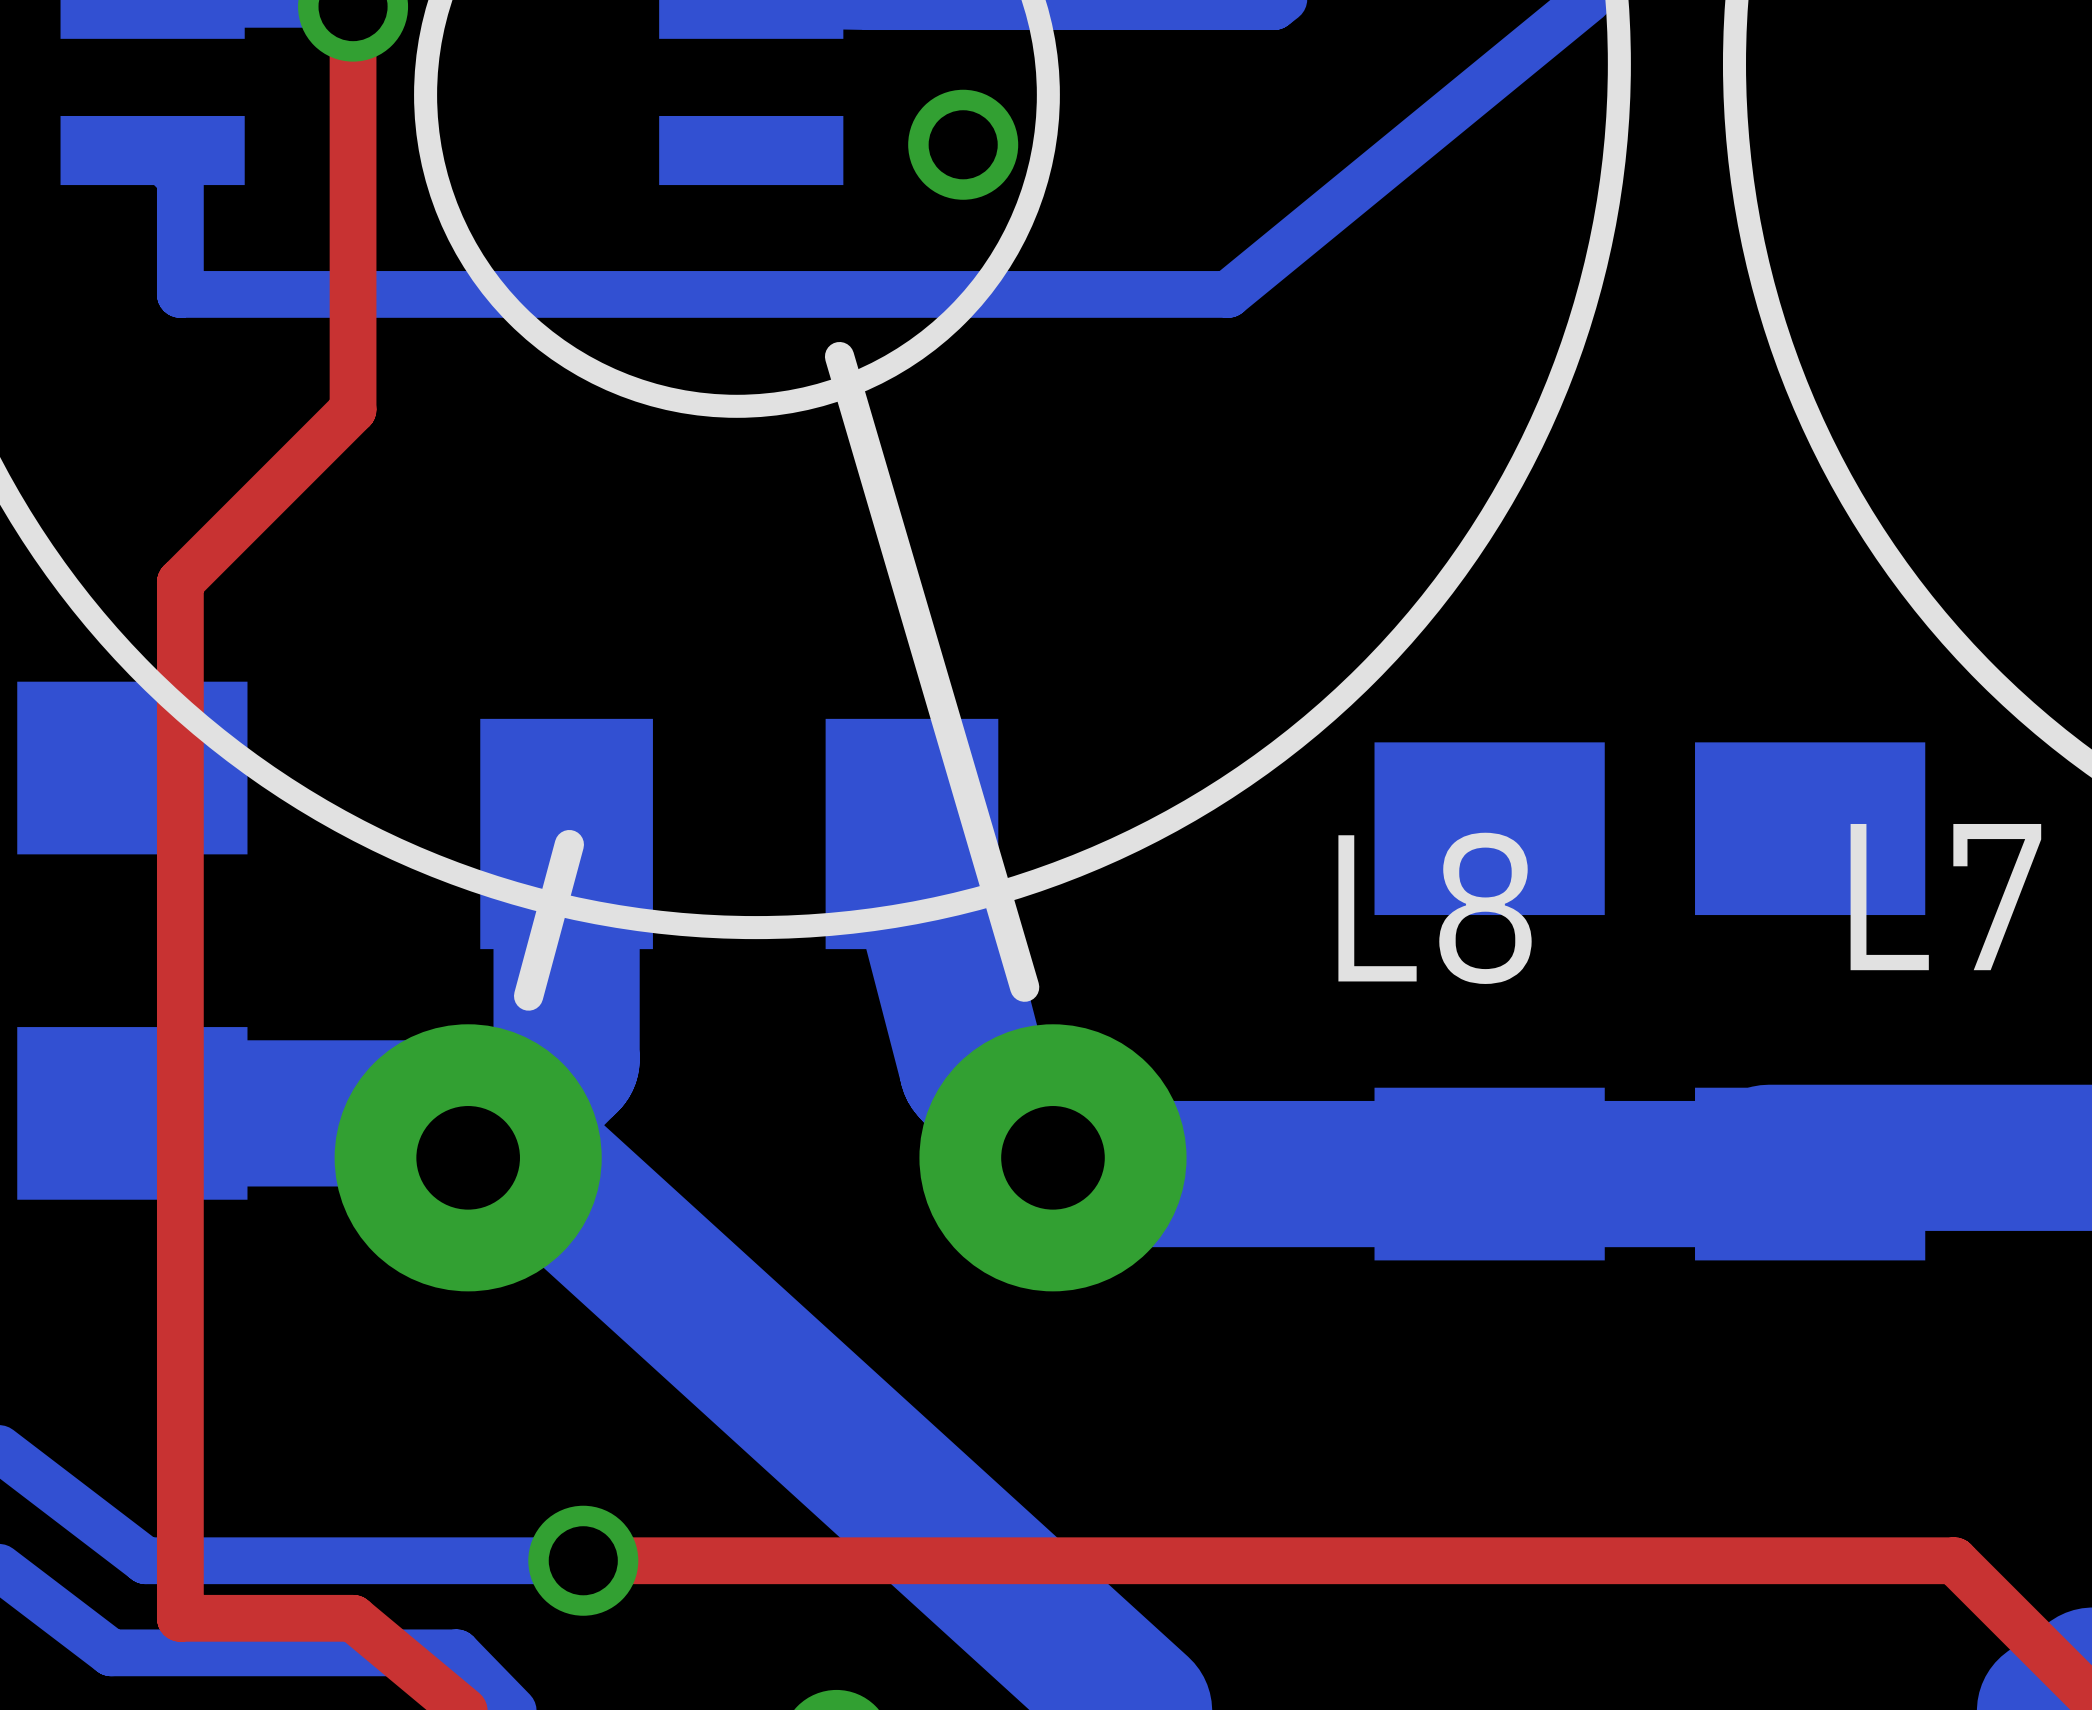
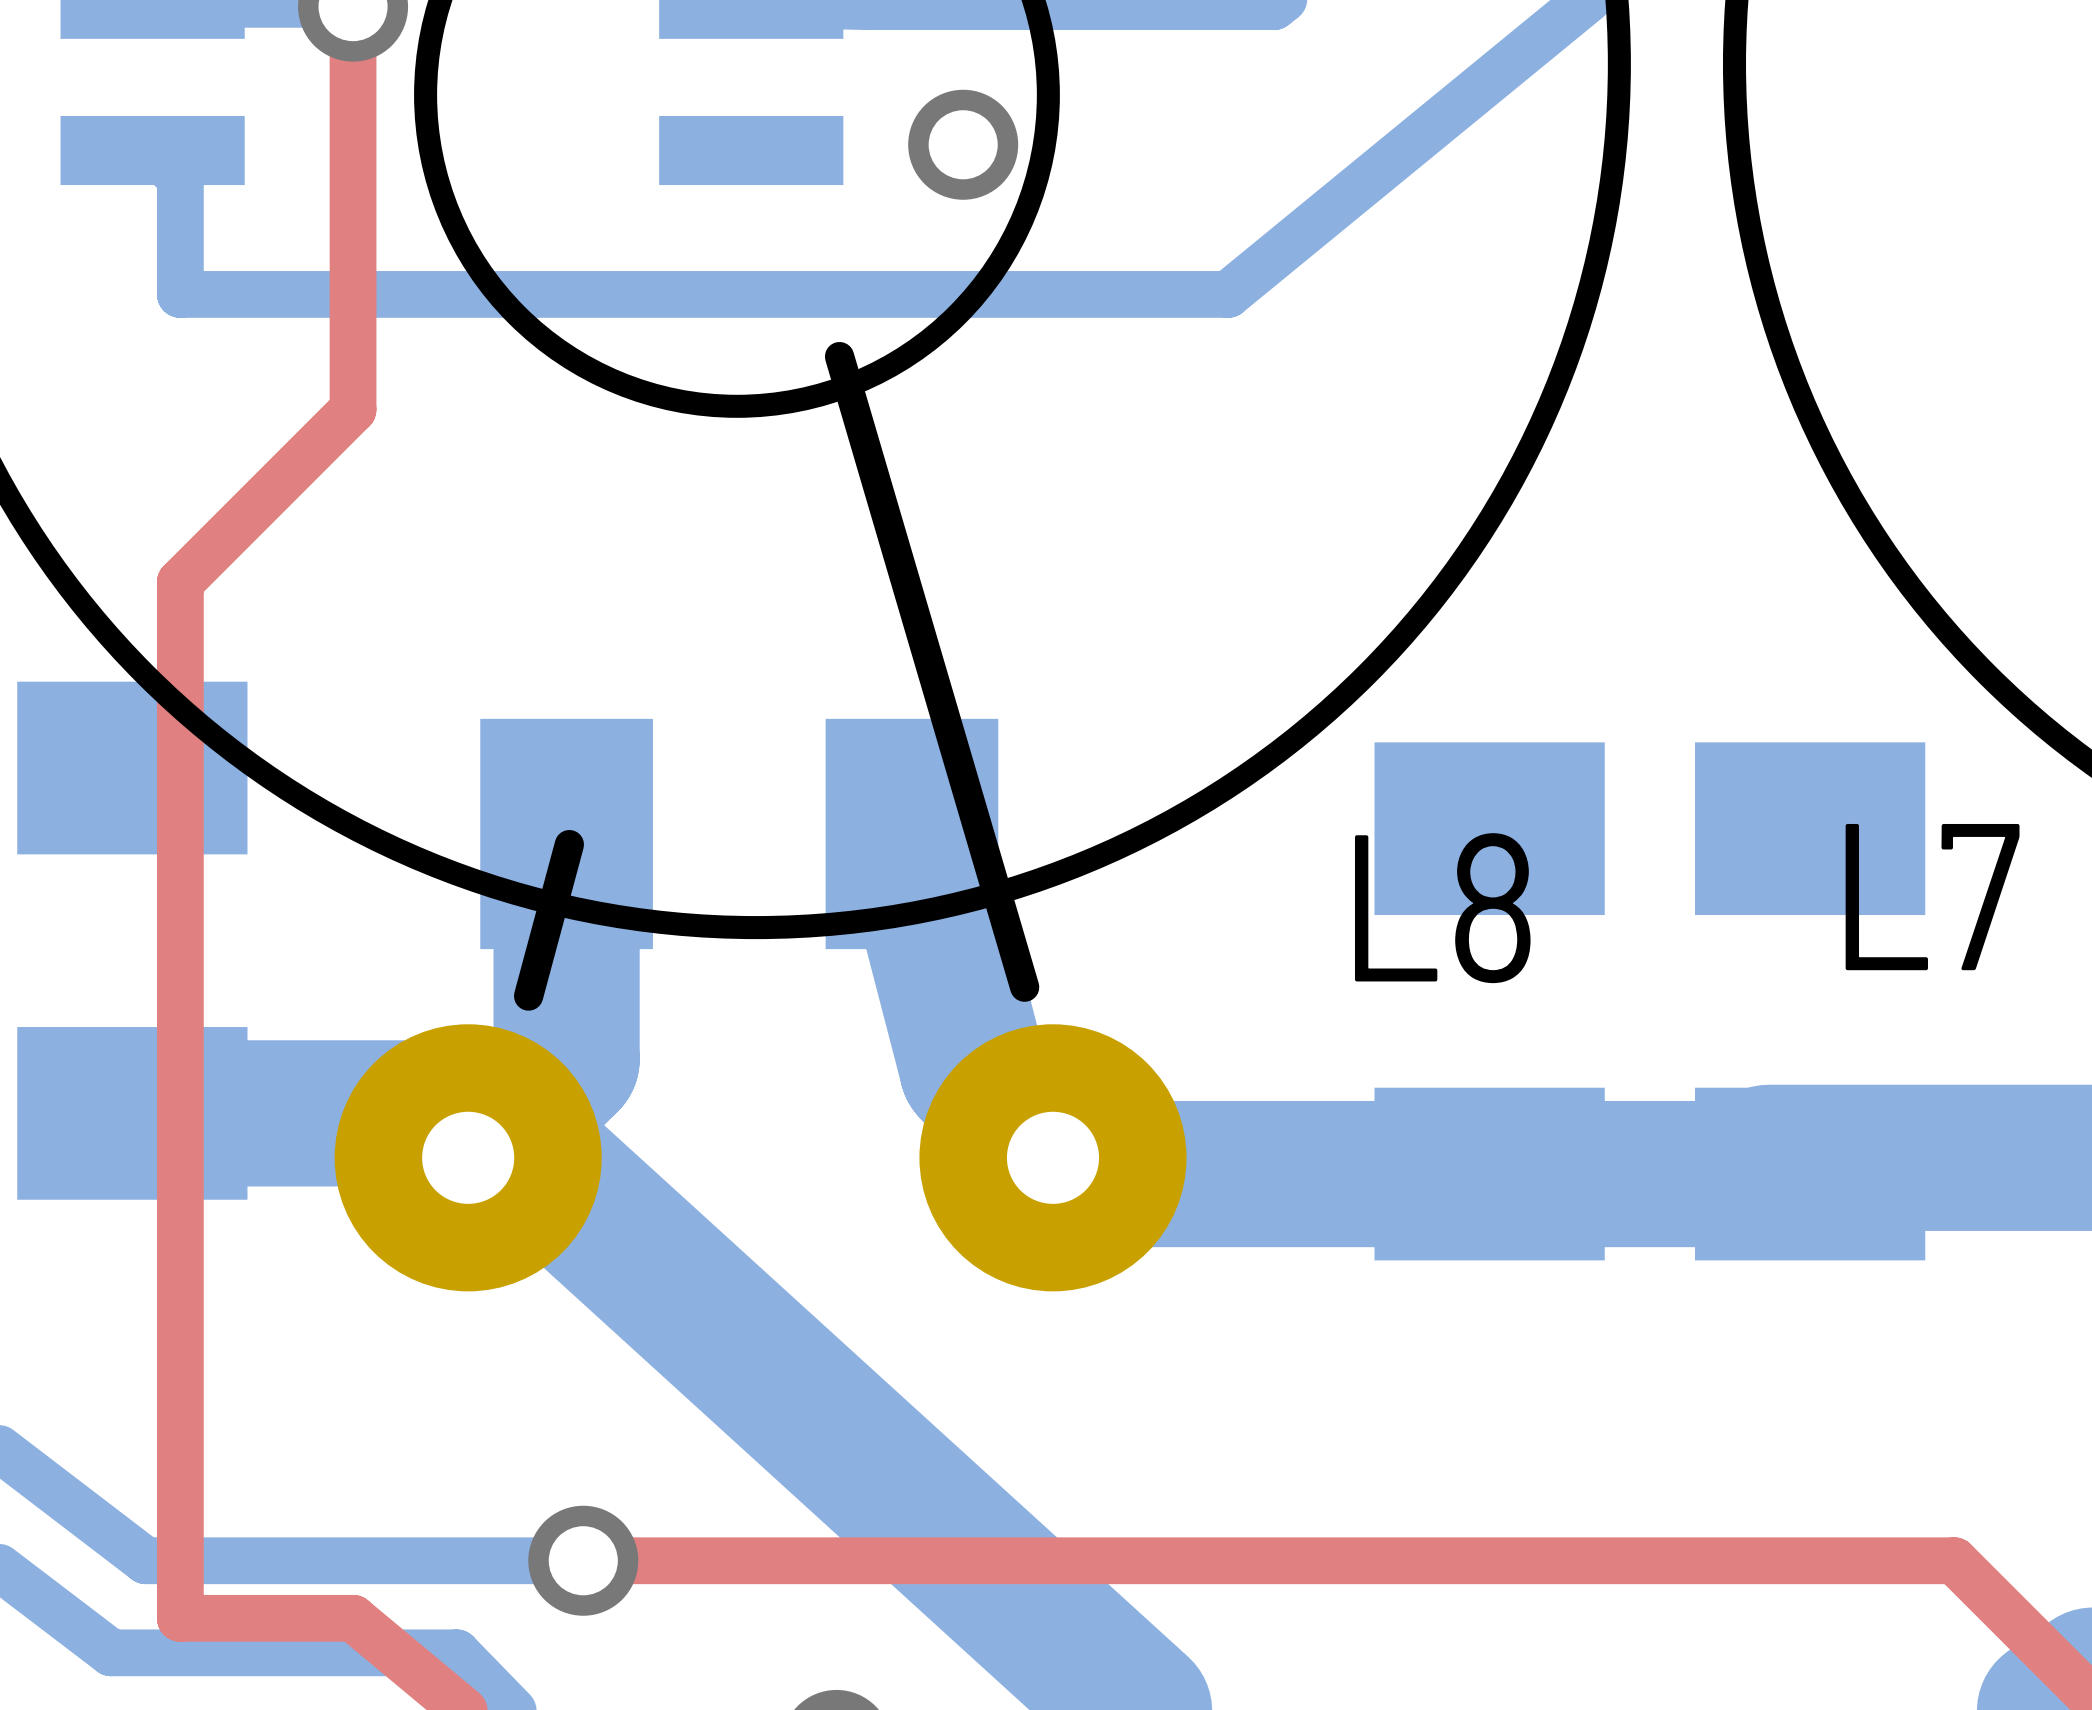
L8 footprint: [334, 1024, 1187, 1292] -> [334, 1024, 1187, 1292]

